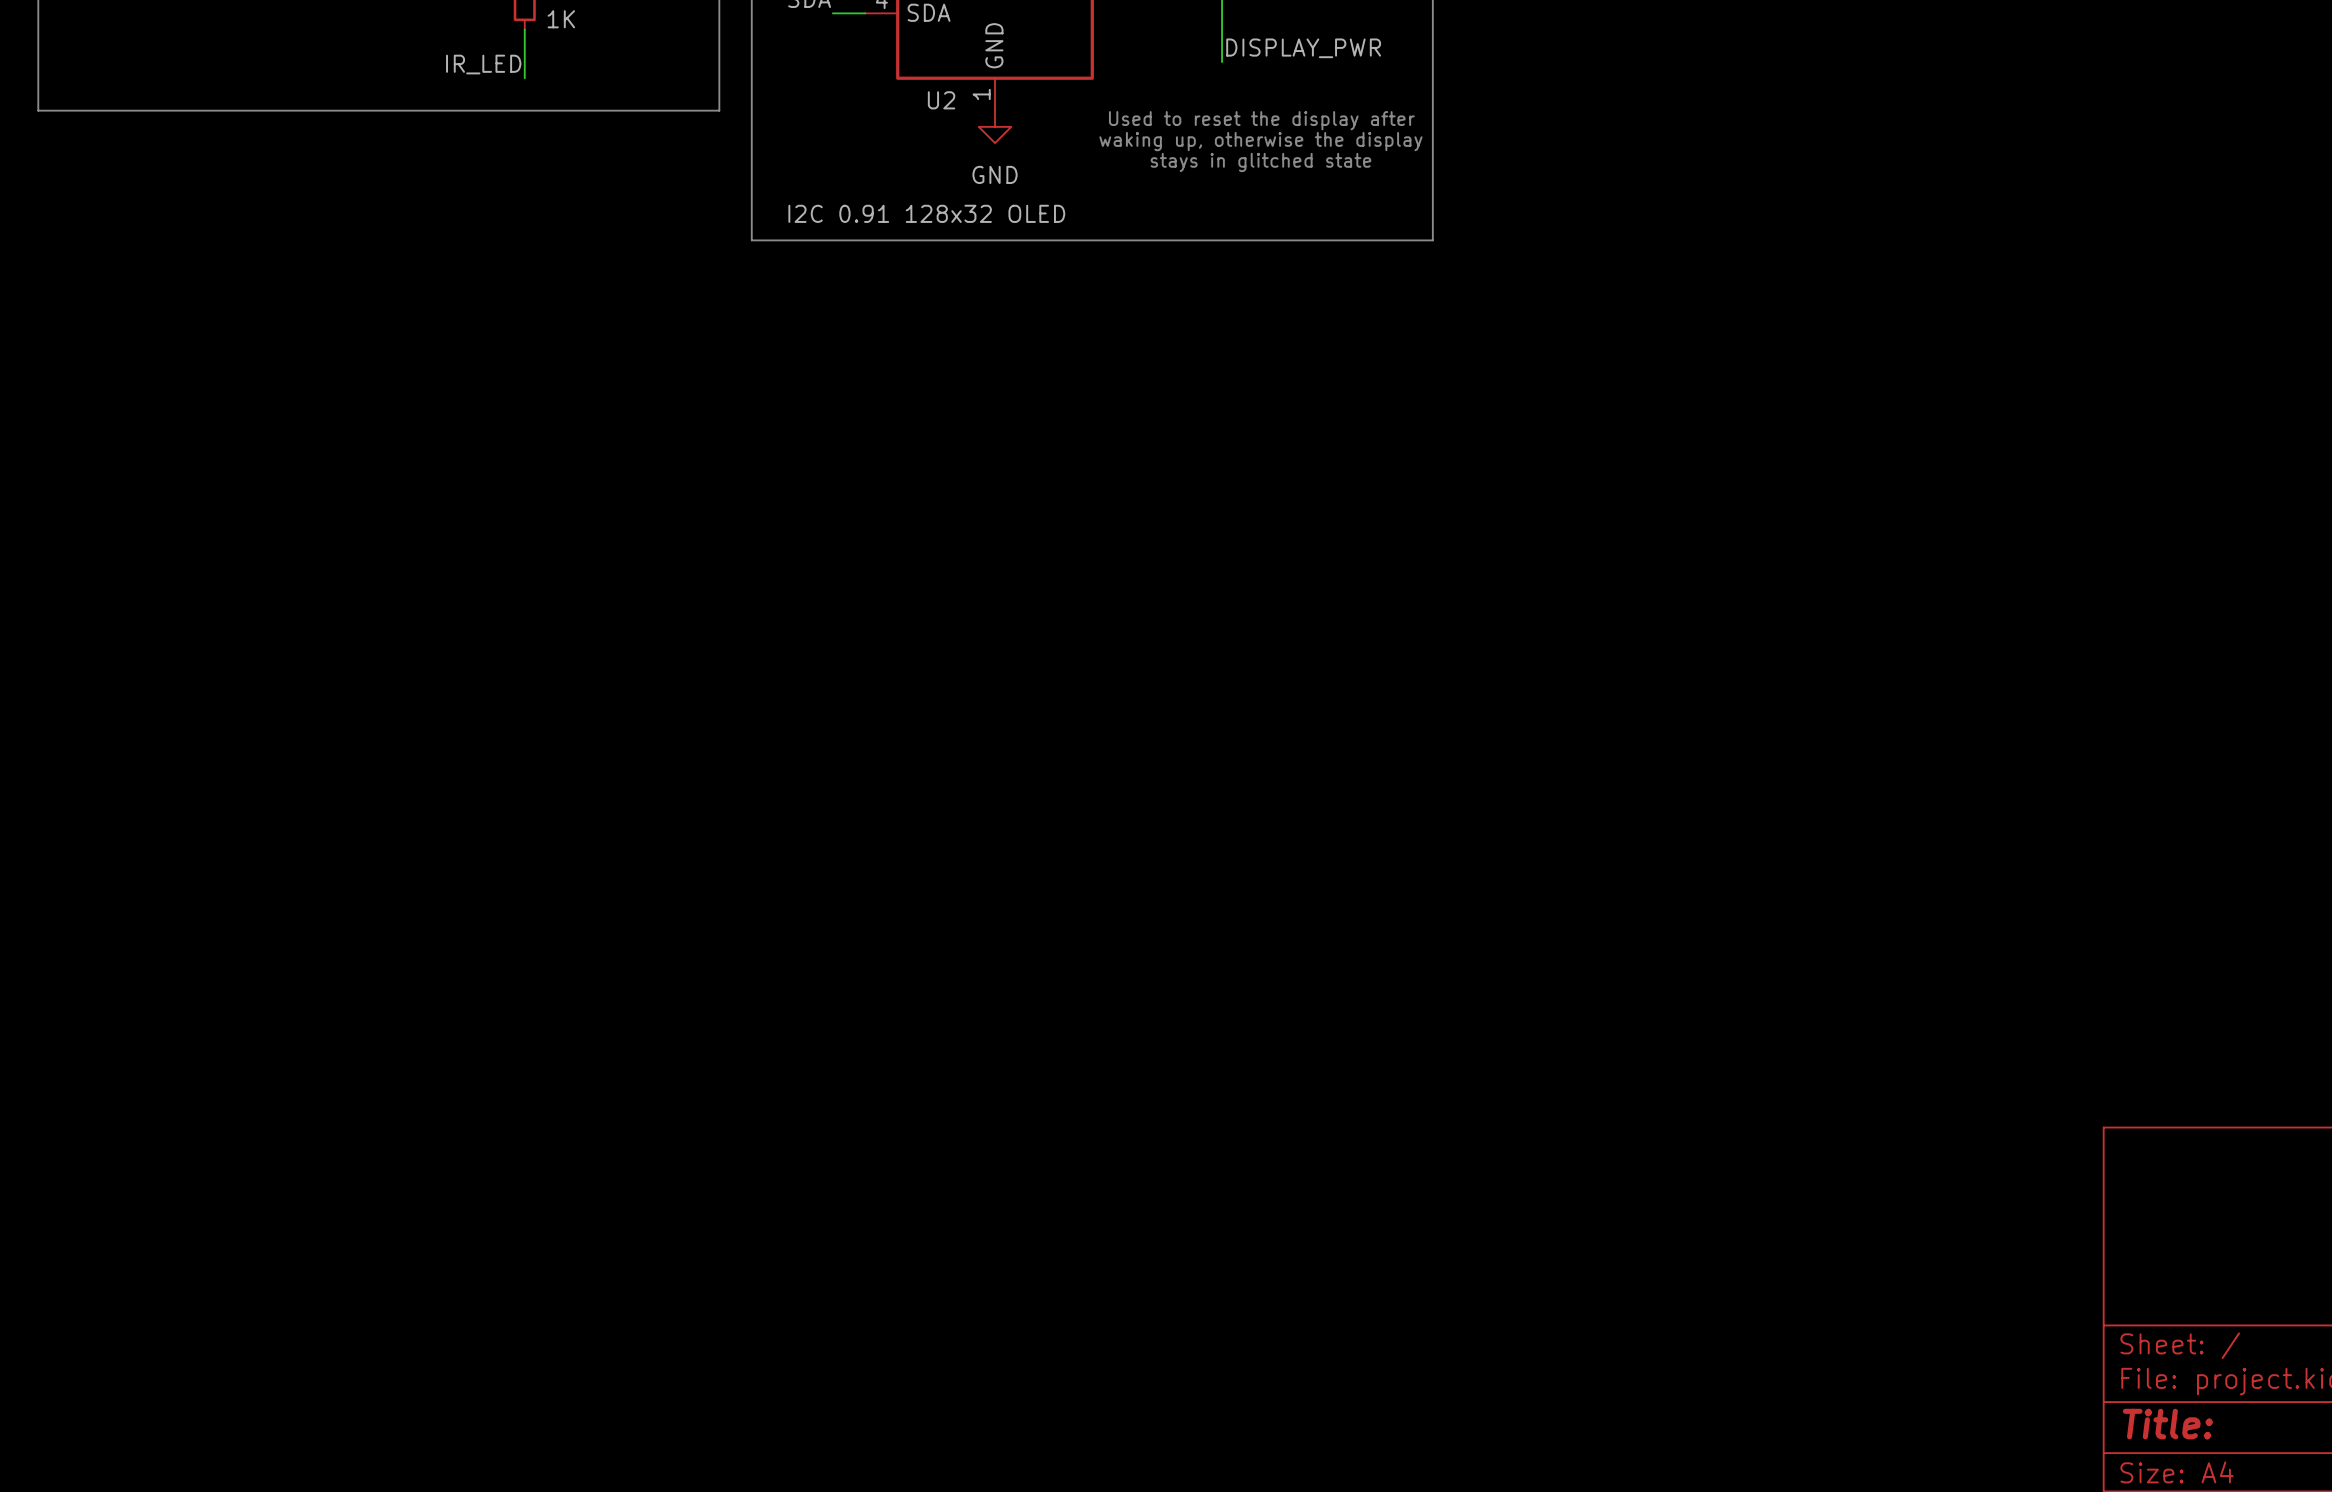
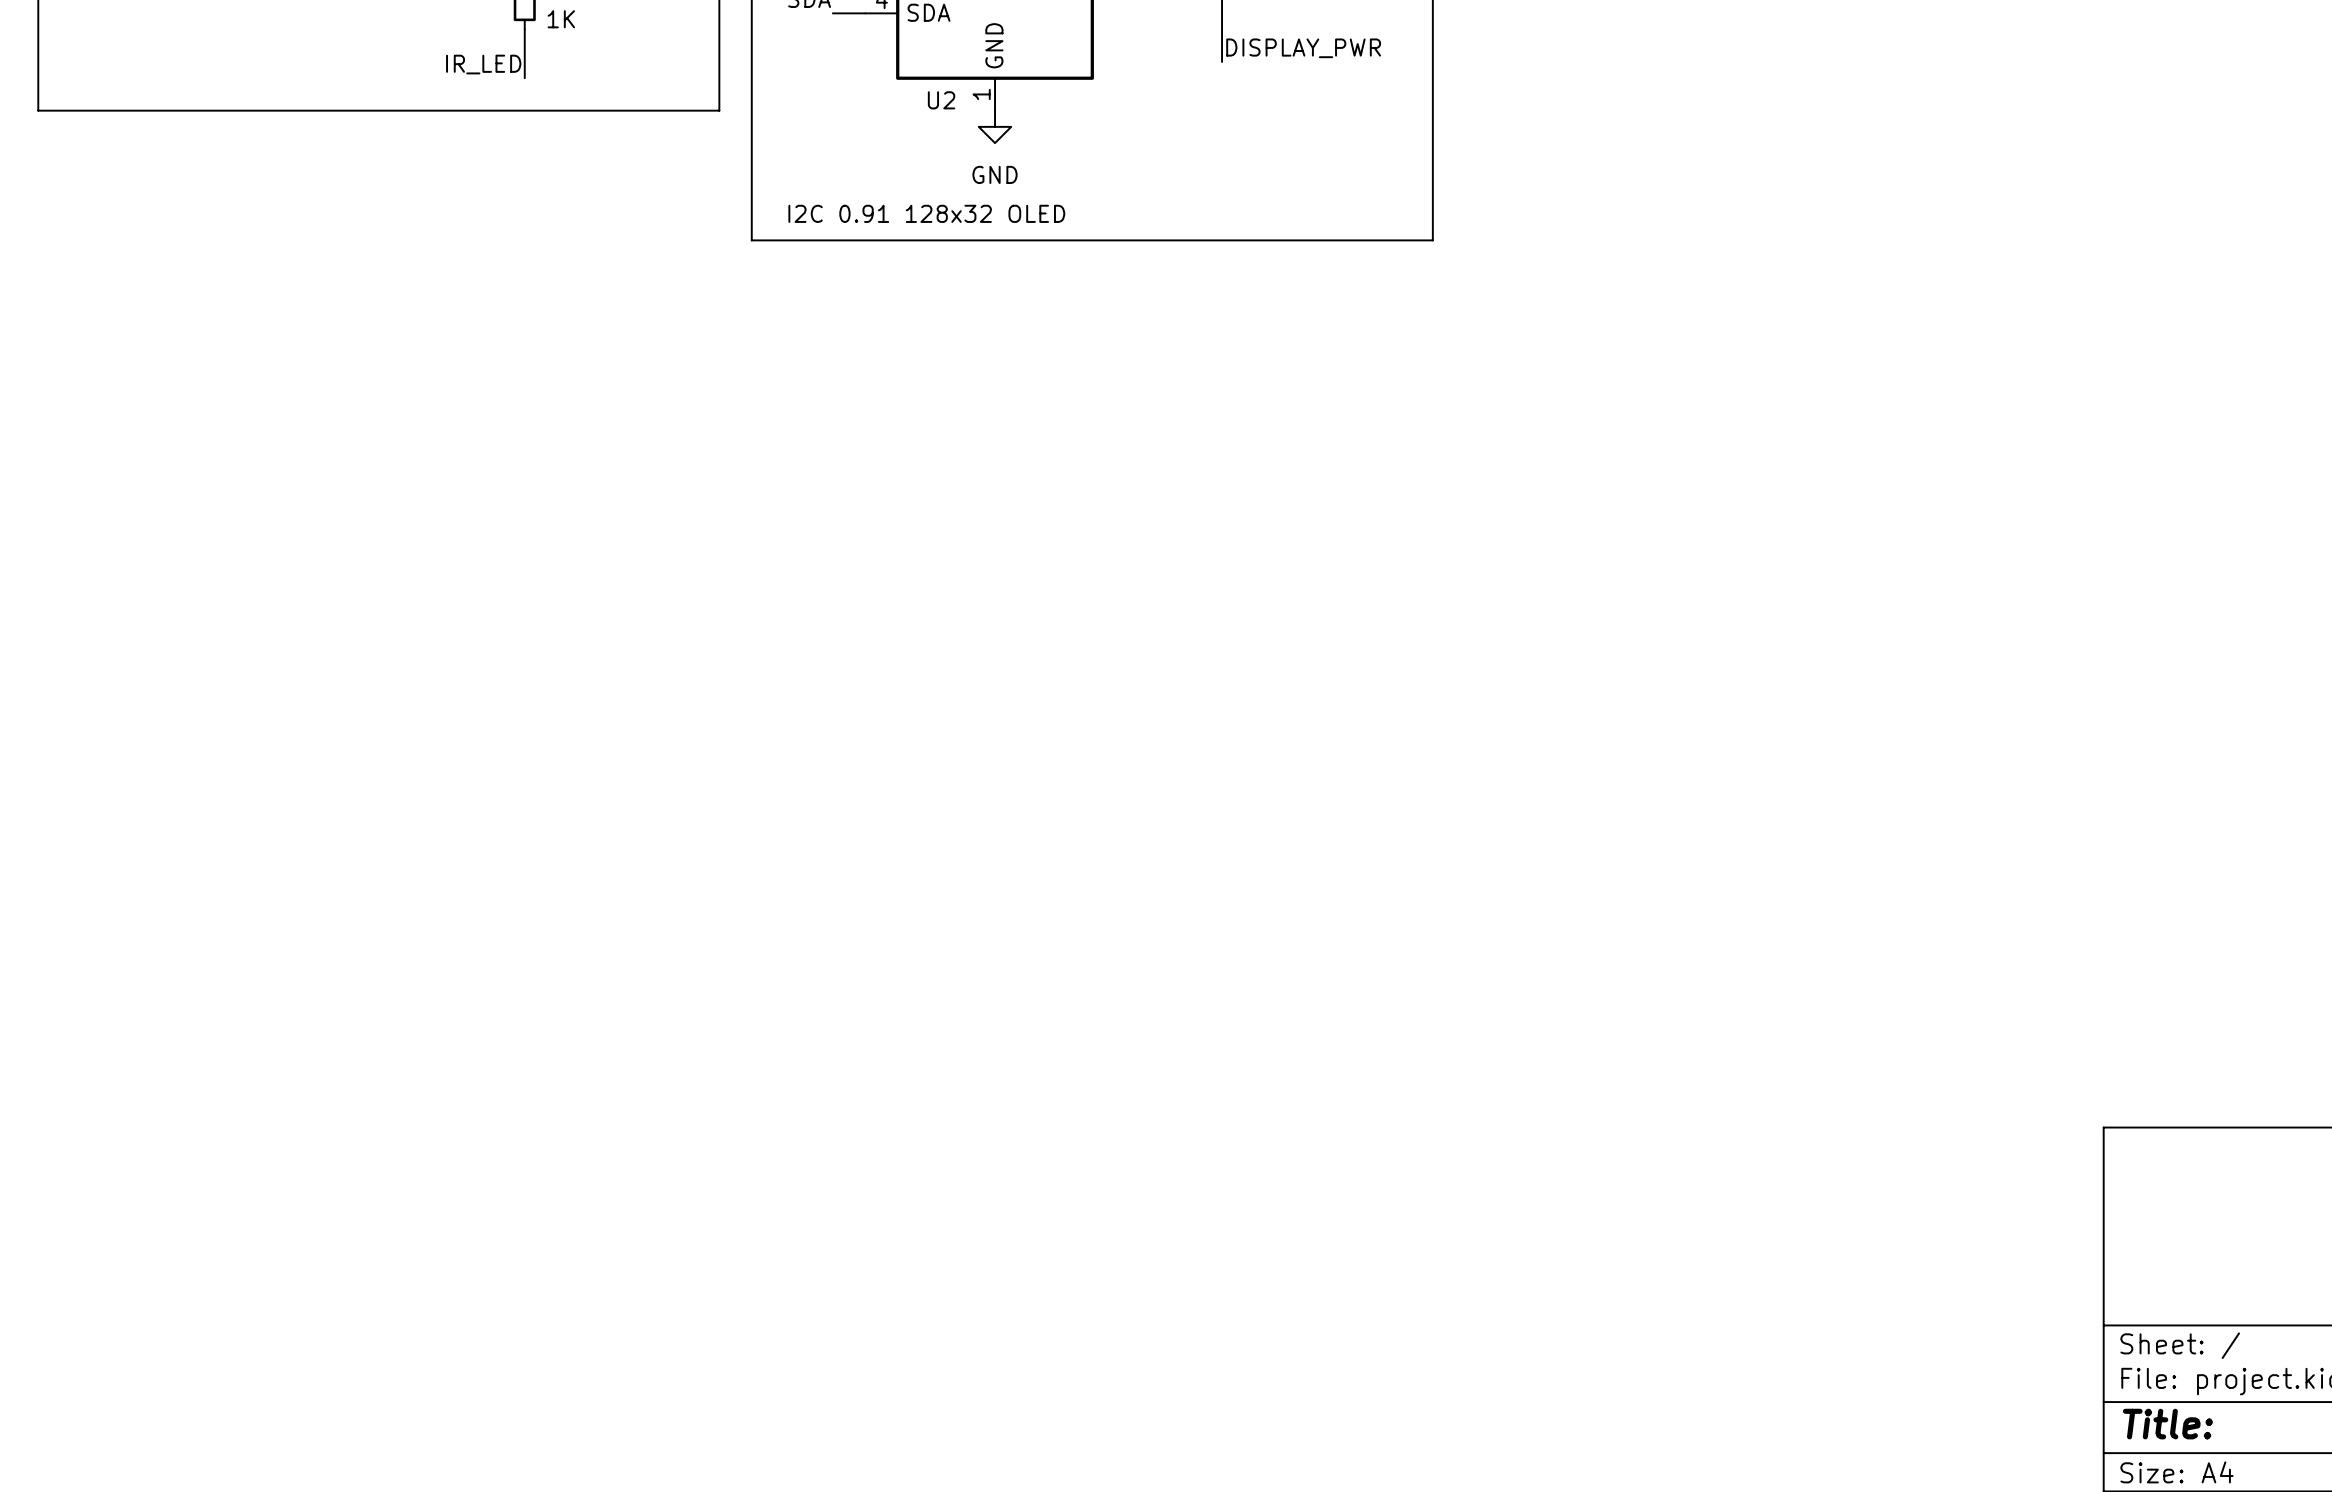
text: Used to reset the display after (1261, 120) -> none
text: waking up, otherwise the display (1260, 141) -> none
text: stays in glitched state (1260, 162) -> none

